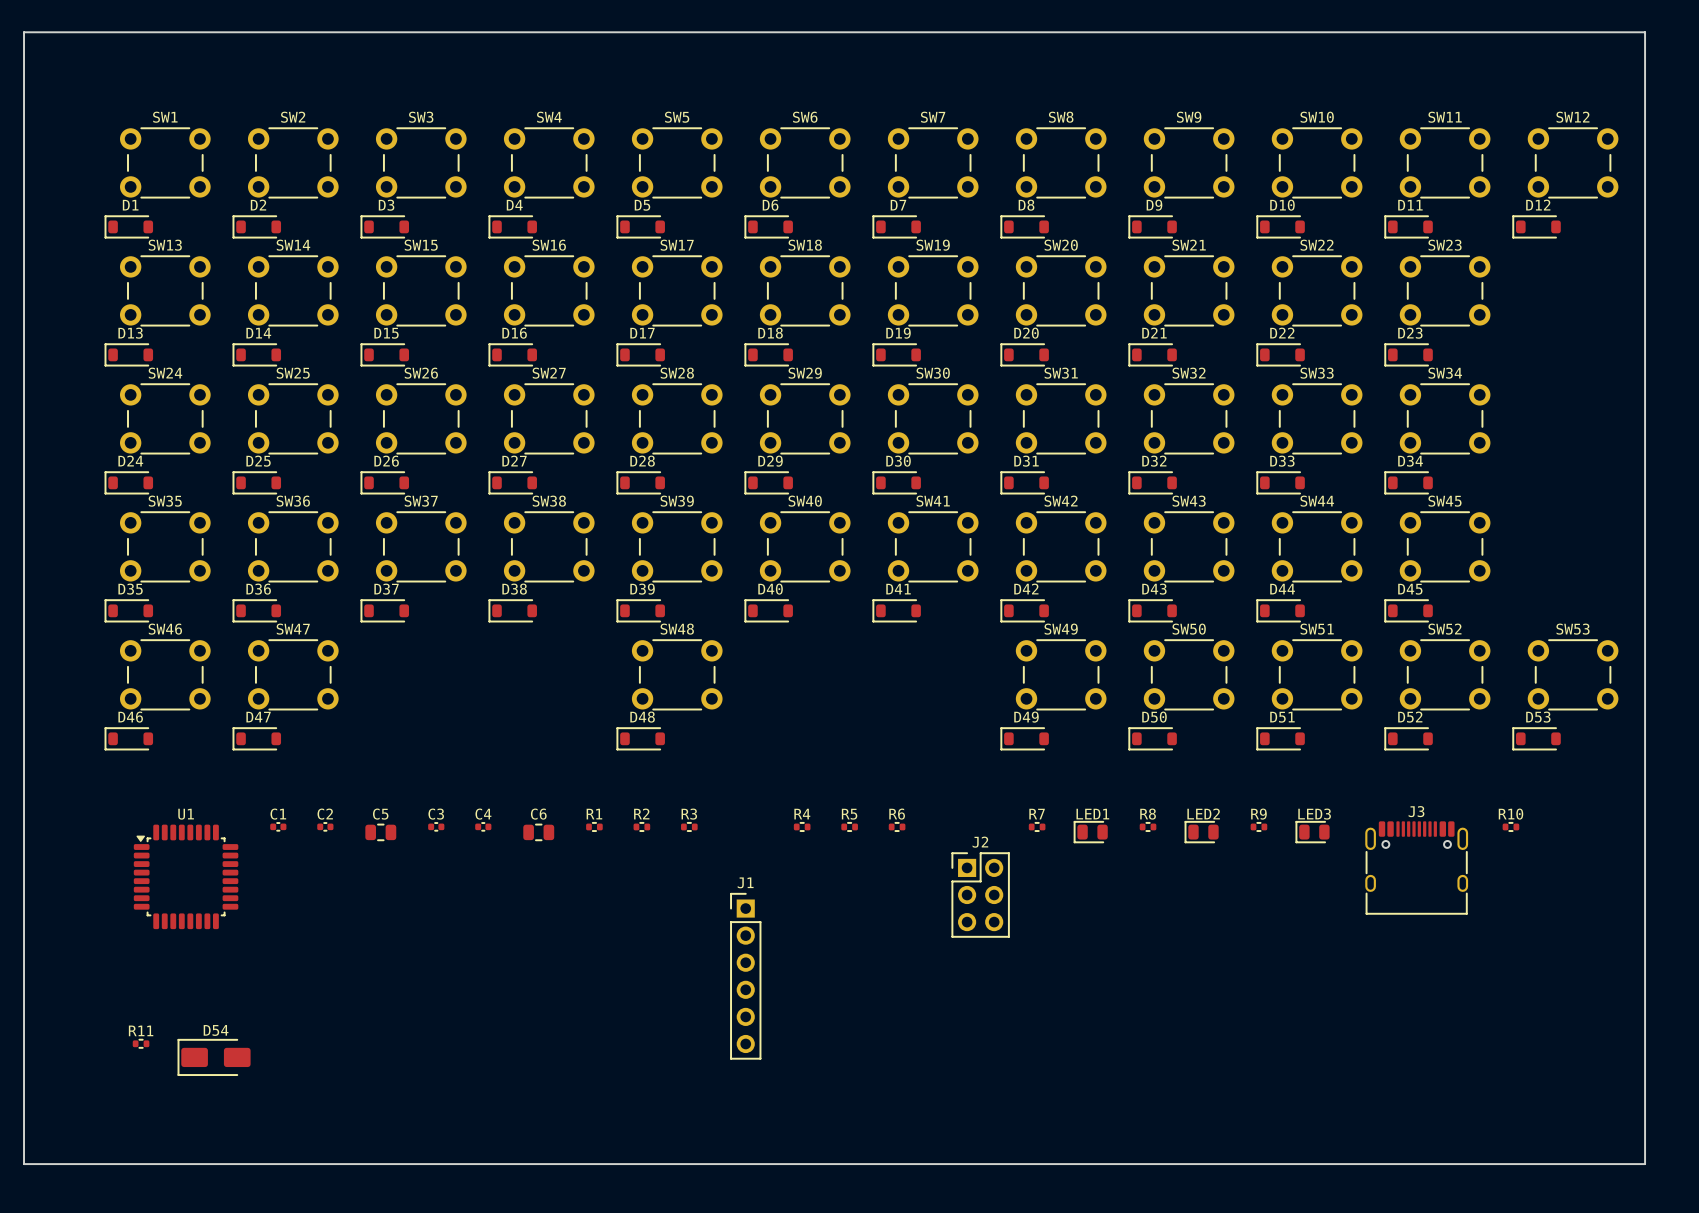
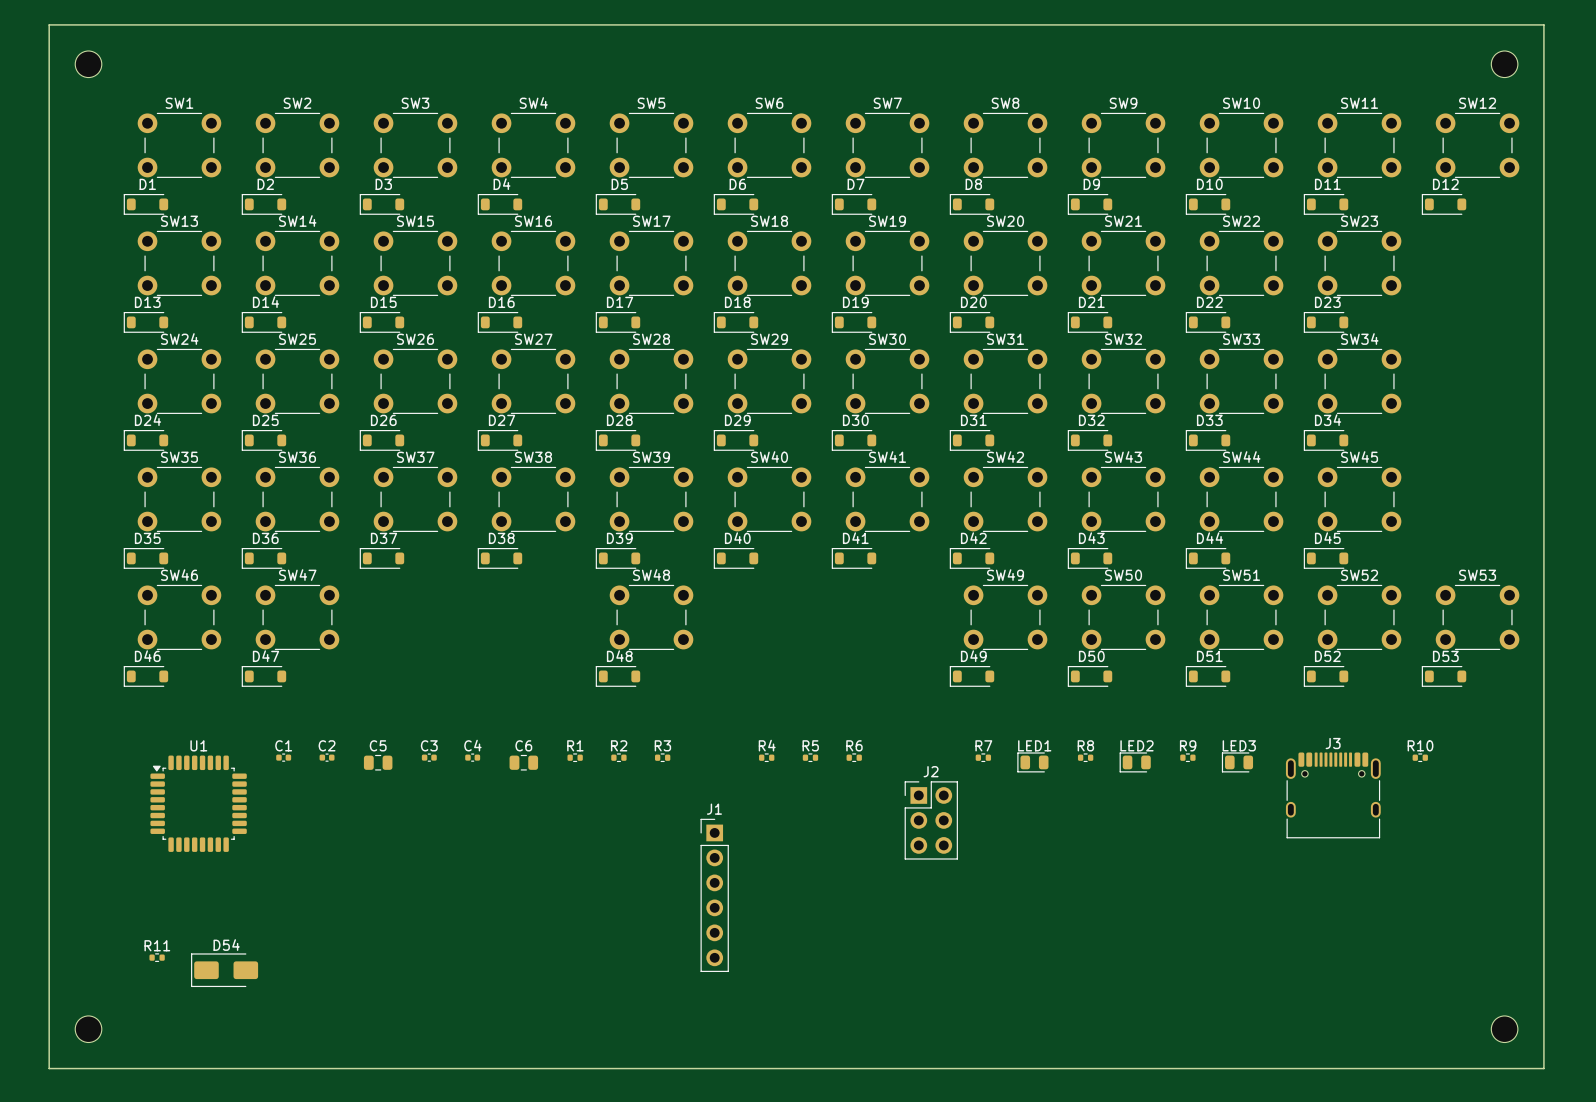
part: none -> (88, 64)
part: none -> (1504, 64)
part: none -> (88, 1029)
part: none -> (1504, 1029)

